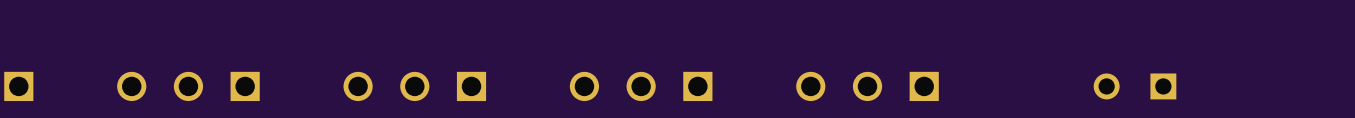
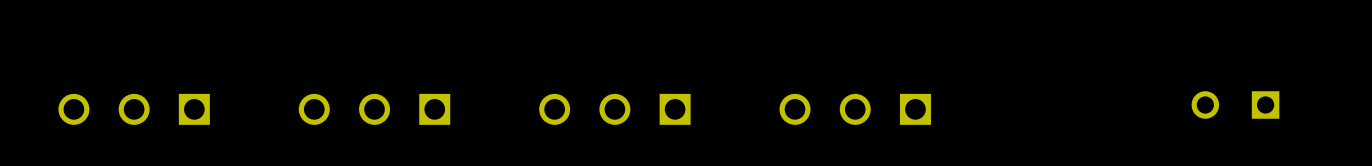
part position: (1135, 86) -> (1235, 104)

